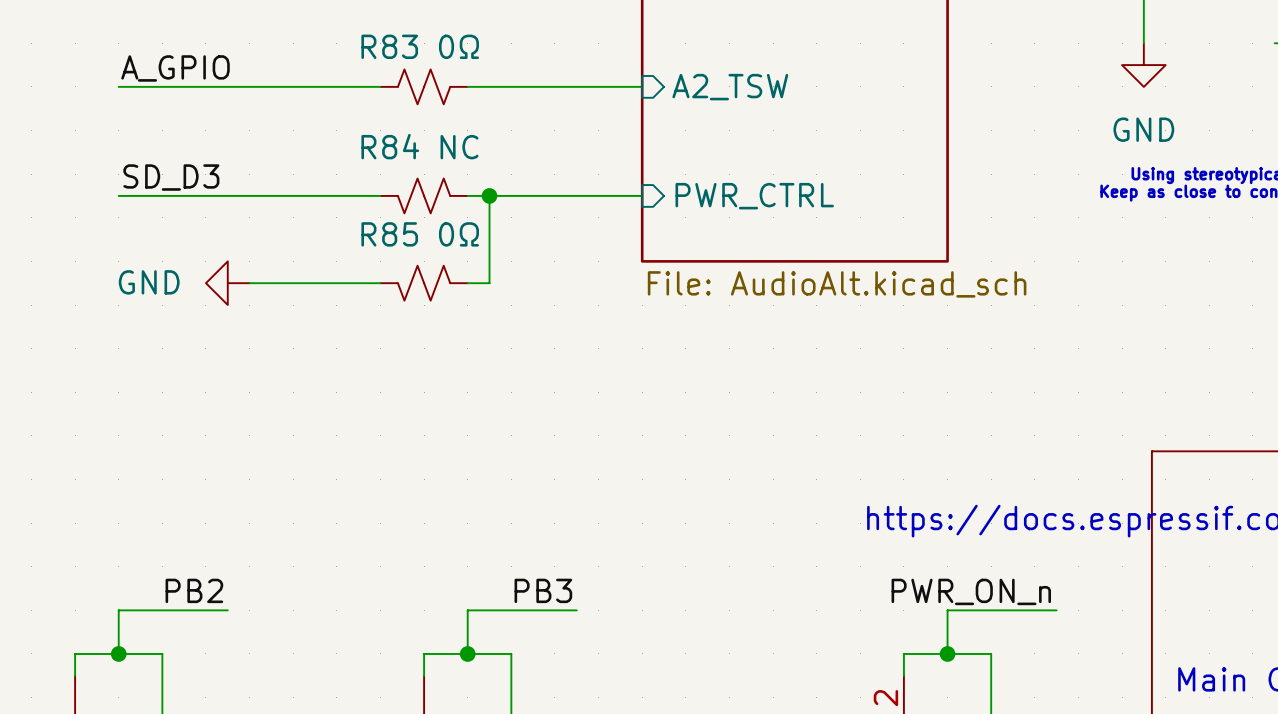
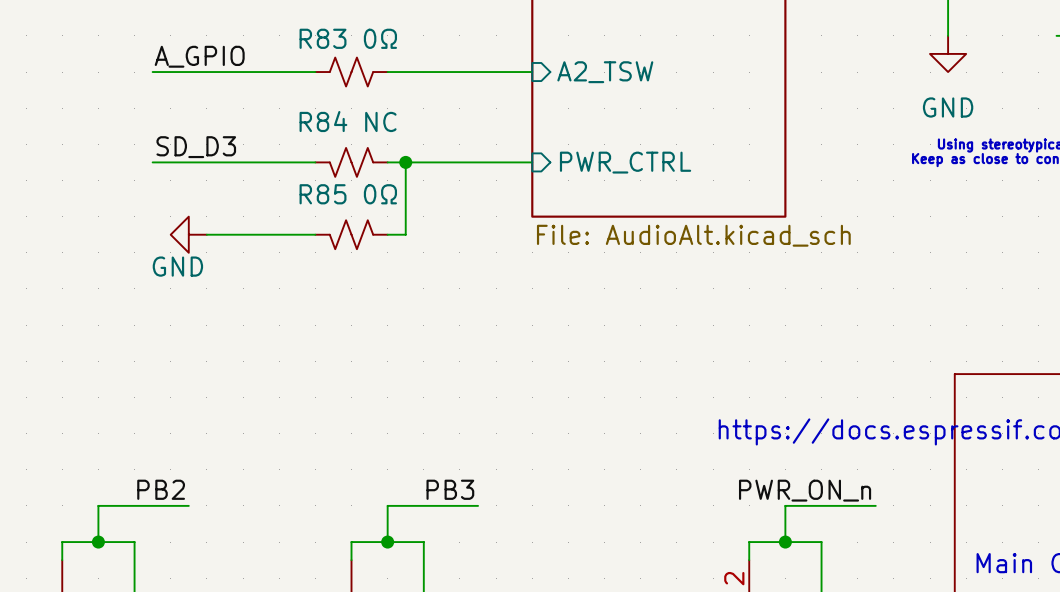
label position: A_GPIO (175, 68) -> A_GPIO (199, 56)
wire: (118, 86) (184, 86) -> none
label position: SD_D3 (171, 177) -> SD_D3 (196, 147)
wire: (118, 195) (184, 195) -> none
power symbol text position: GND (149, 282) -> GND (177, 266)

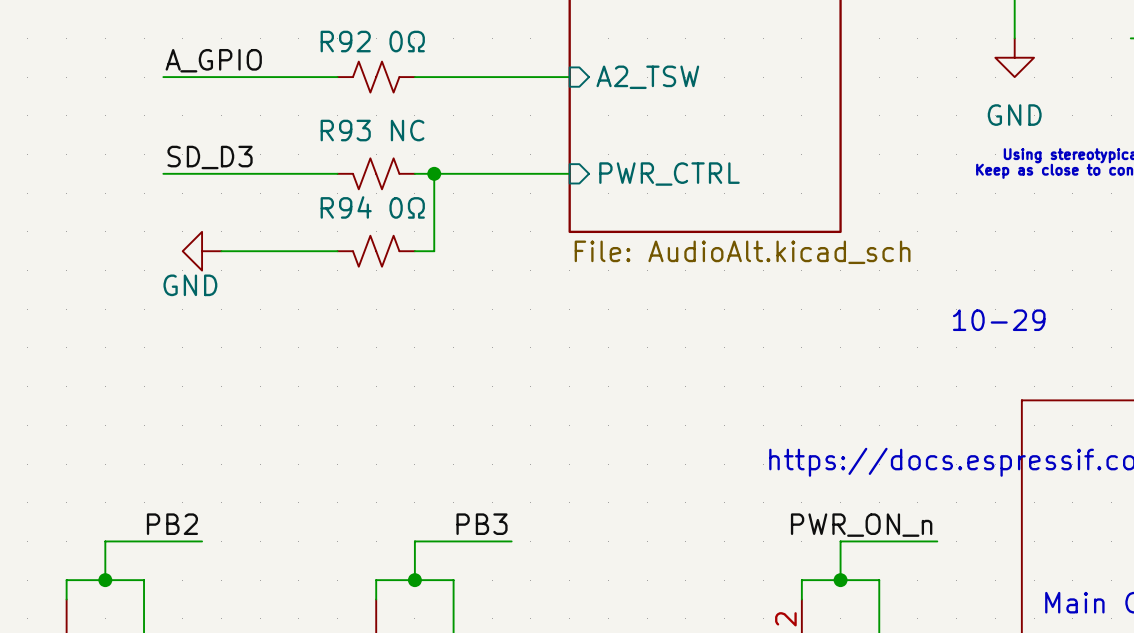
R83 name: R83 (323, 38) -> R92 (345, 41)
R84 name: R84 (323, 121) -> R93 (345, 130)
R85 name: R85 (323, 194) -> R94 (346, 207)
text: none -> 10-29 (999, 320)

